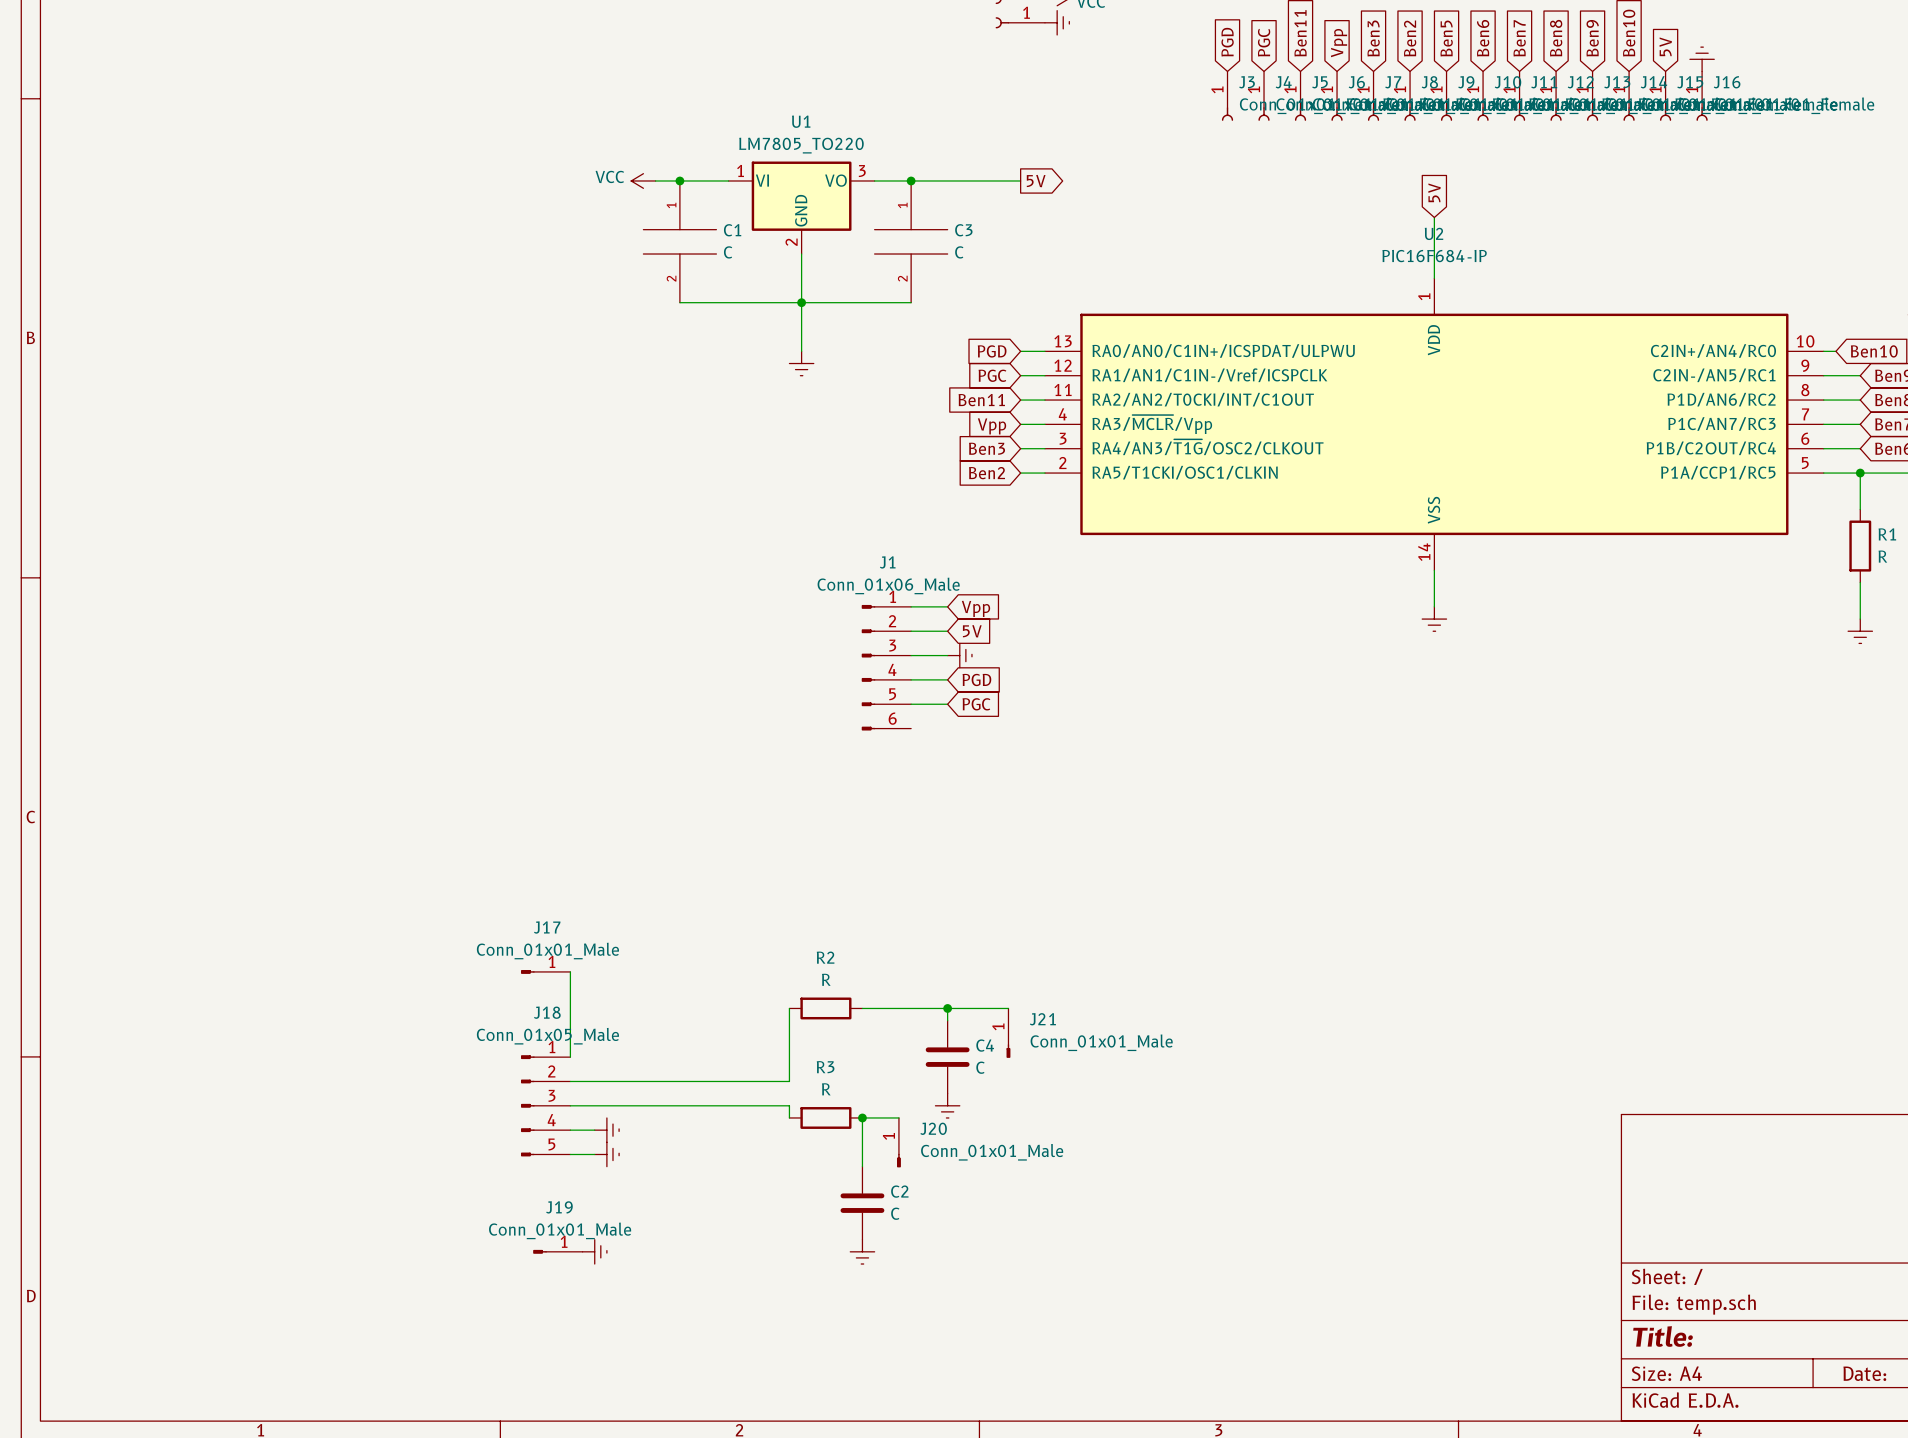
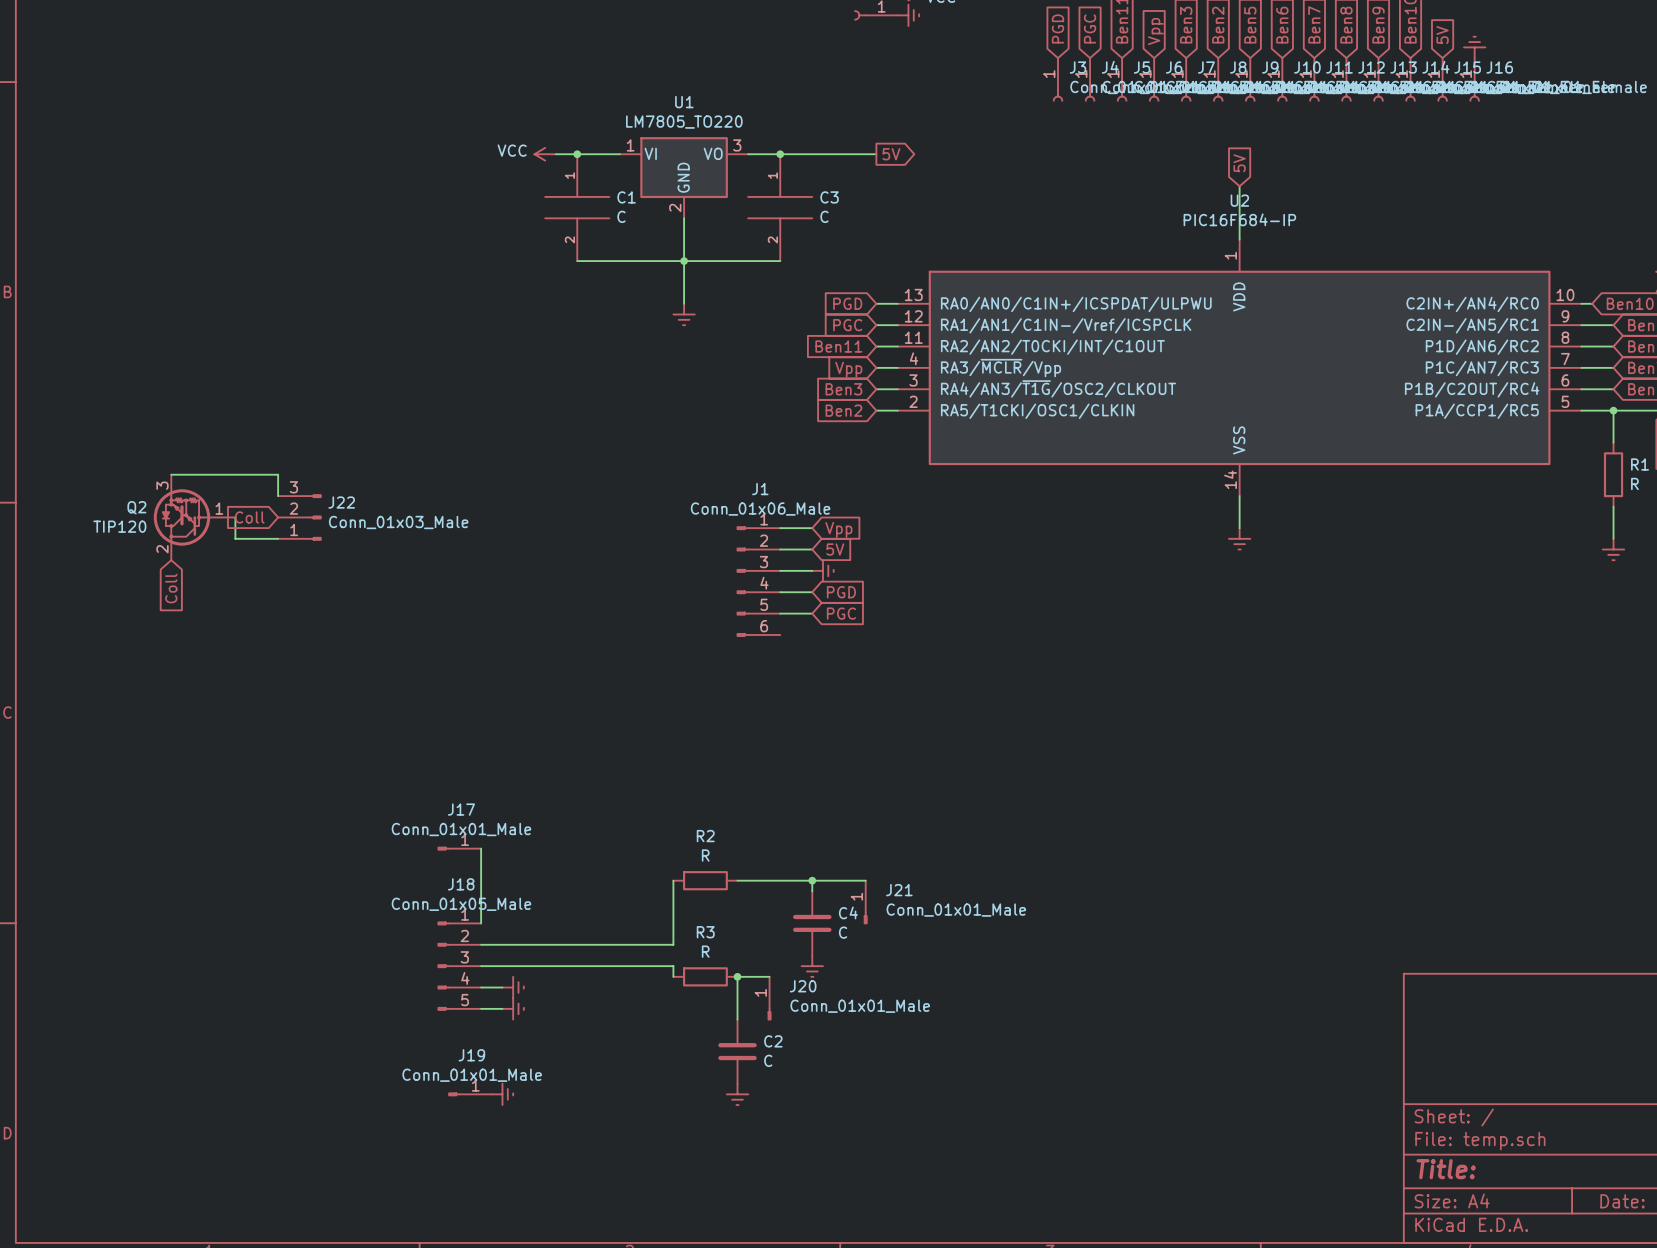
wire: none -> (171, 474) (278, 474) (278, 496)
Q2: none -> TIP120 (194, 517)
wire: none -> (235, 517) (235, 538) (278, 538)
global label: none -> Coll (249, 517)
J22: none -> Conn_01x03_Male (299, 517)
global label: none -> Coll (171, 588)

